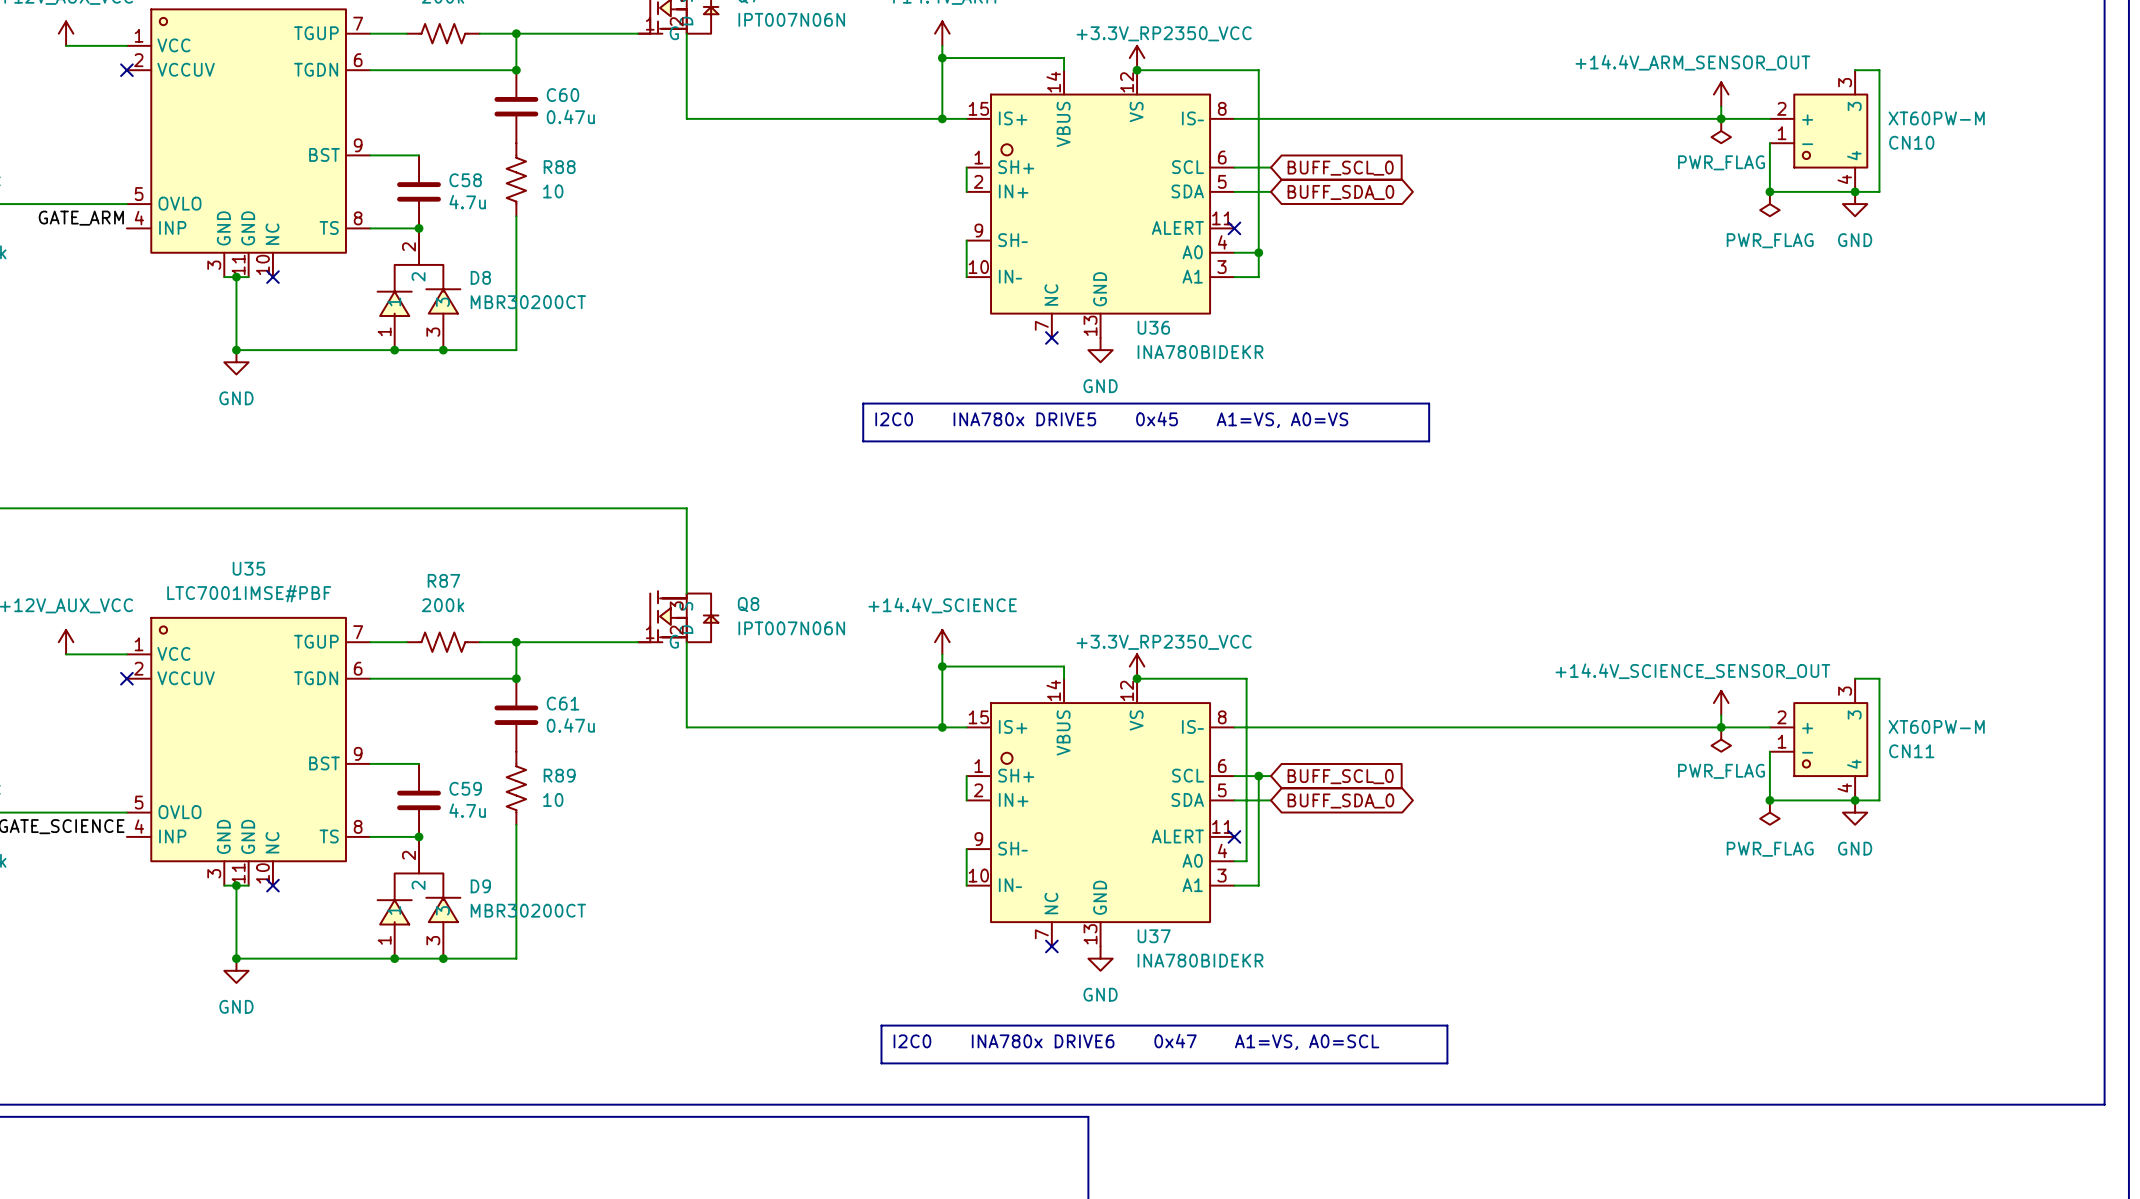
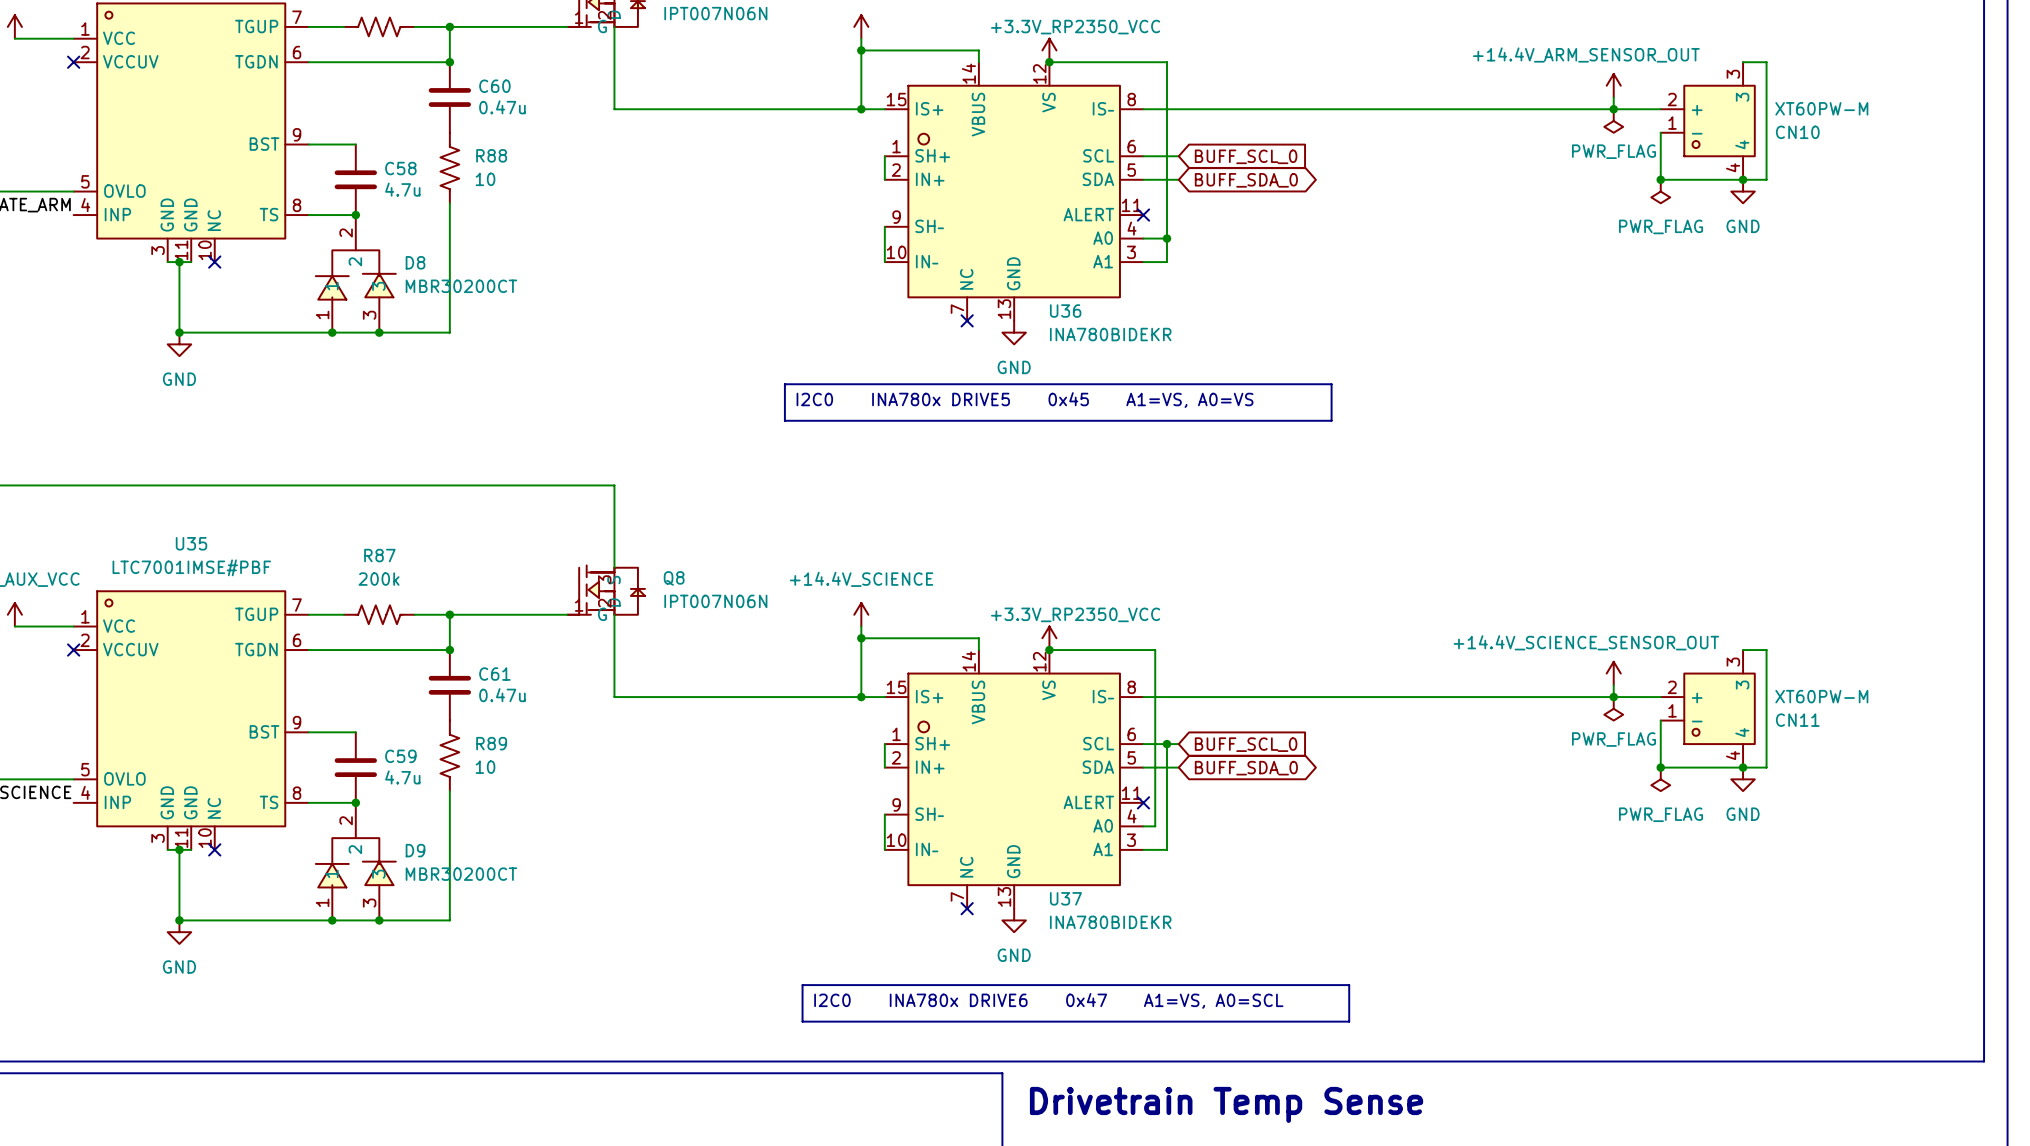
text: none -> Drivetrain Temp Sense (1226, 1104)

